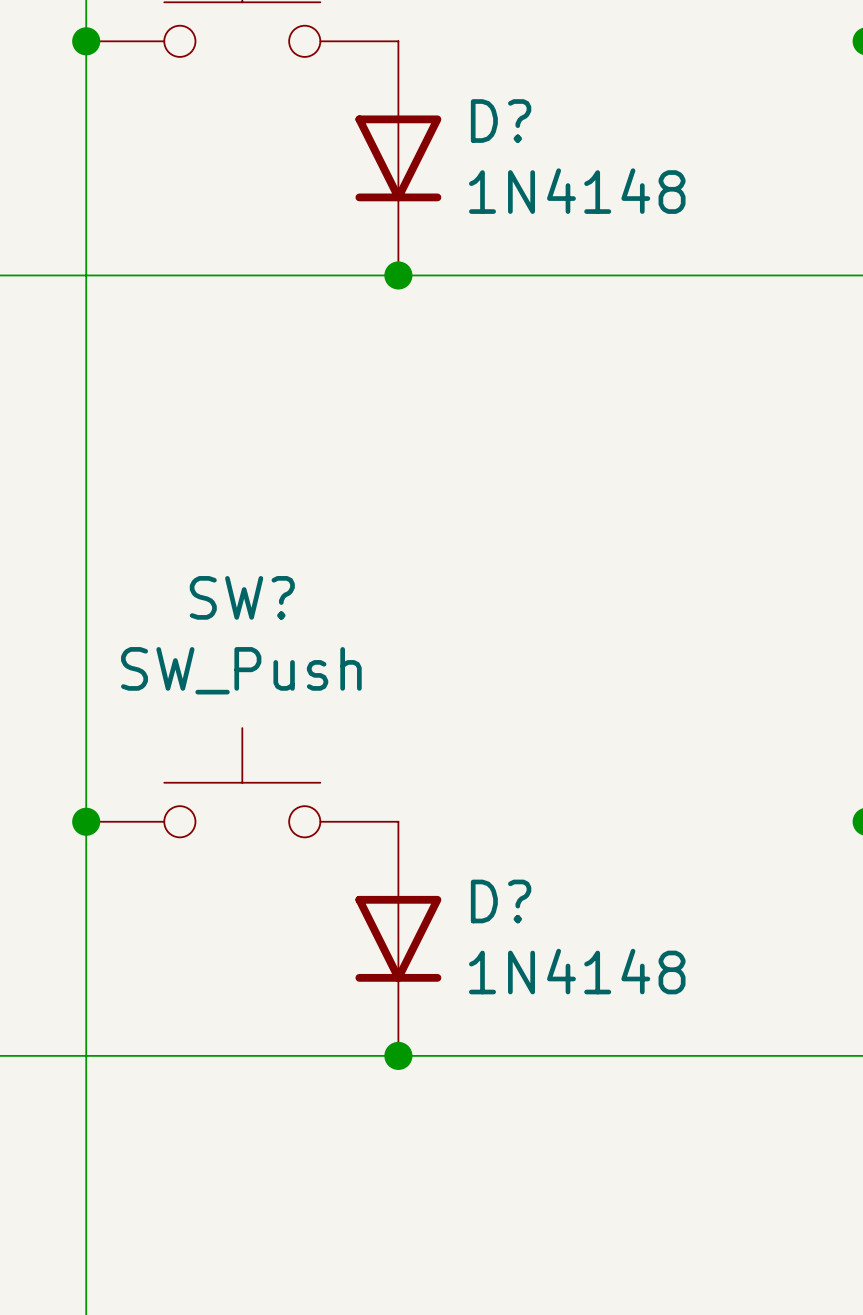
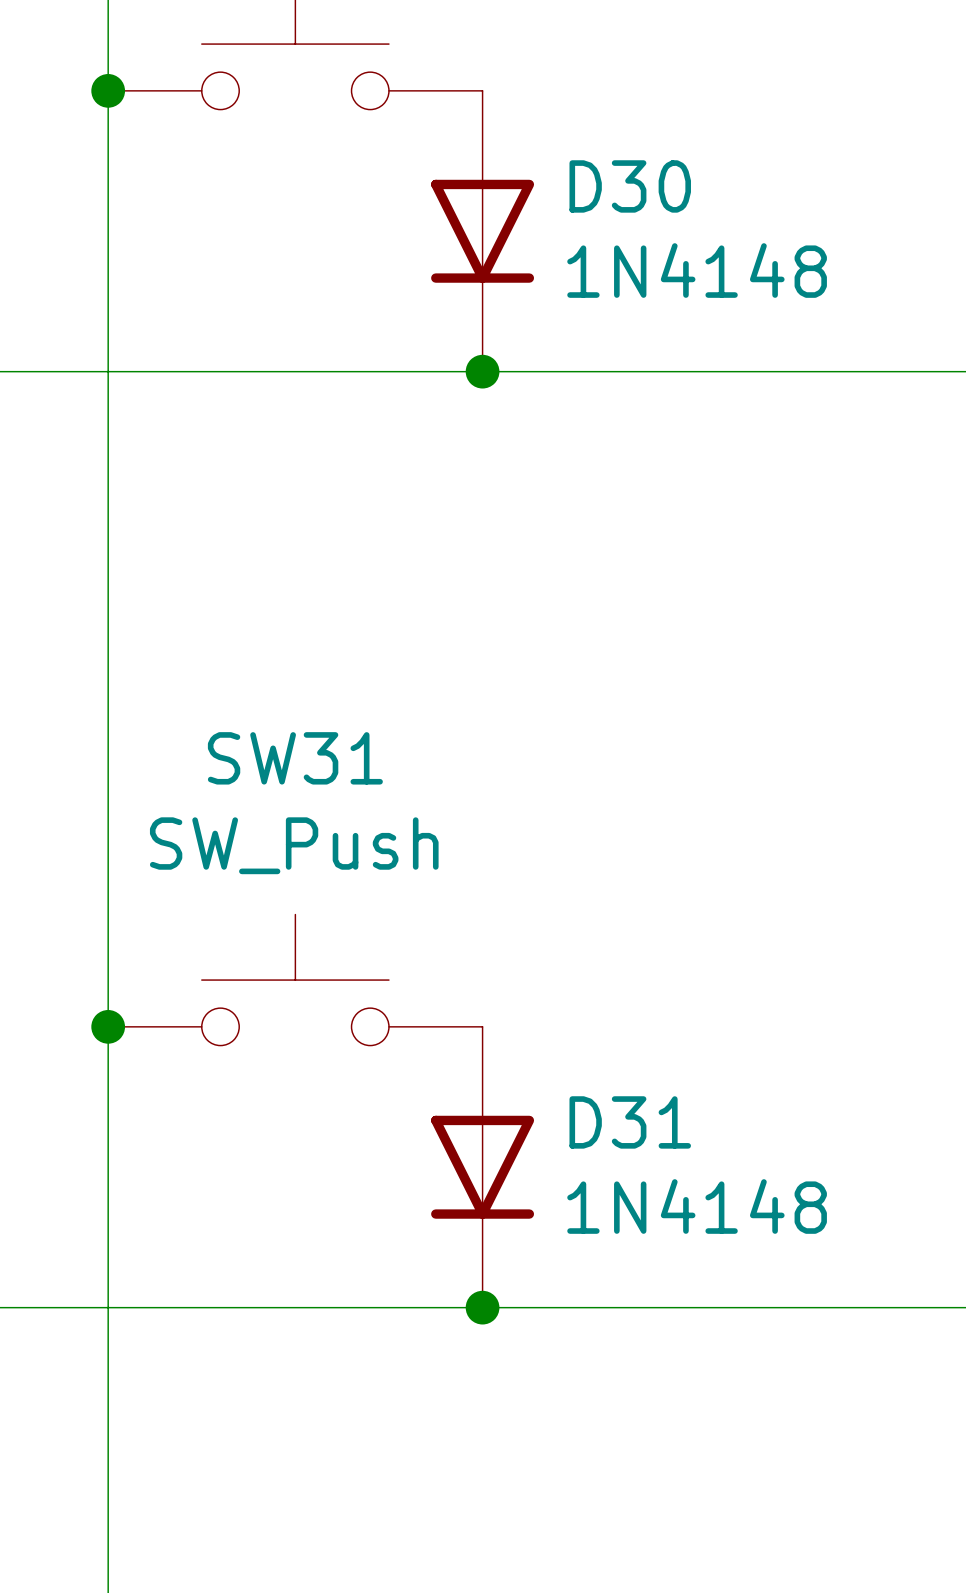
D? name: D? (501, 121) -> D30 (630, 186)
SW? name: SW? (242, 597) -> SW31 (295, 758)
D? name: D? (501, 901) -> D31 (630, 1122)

